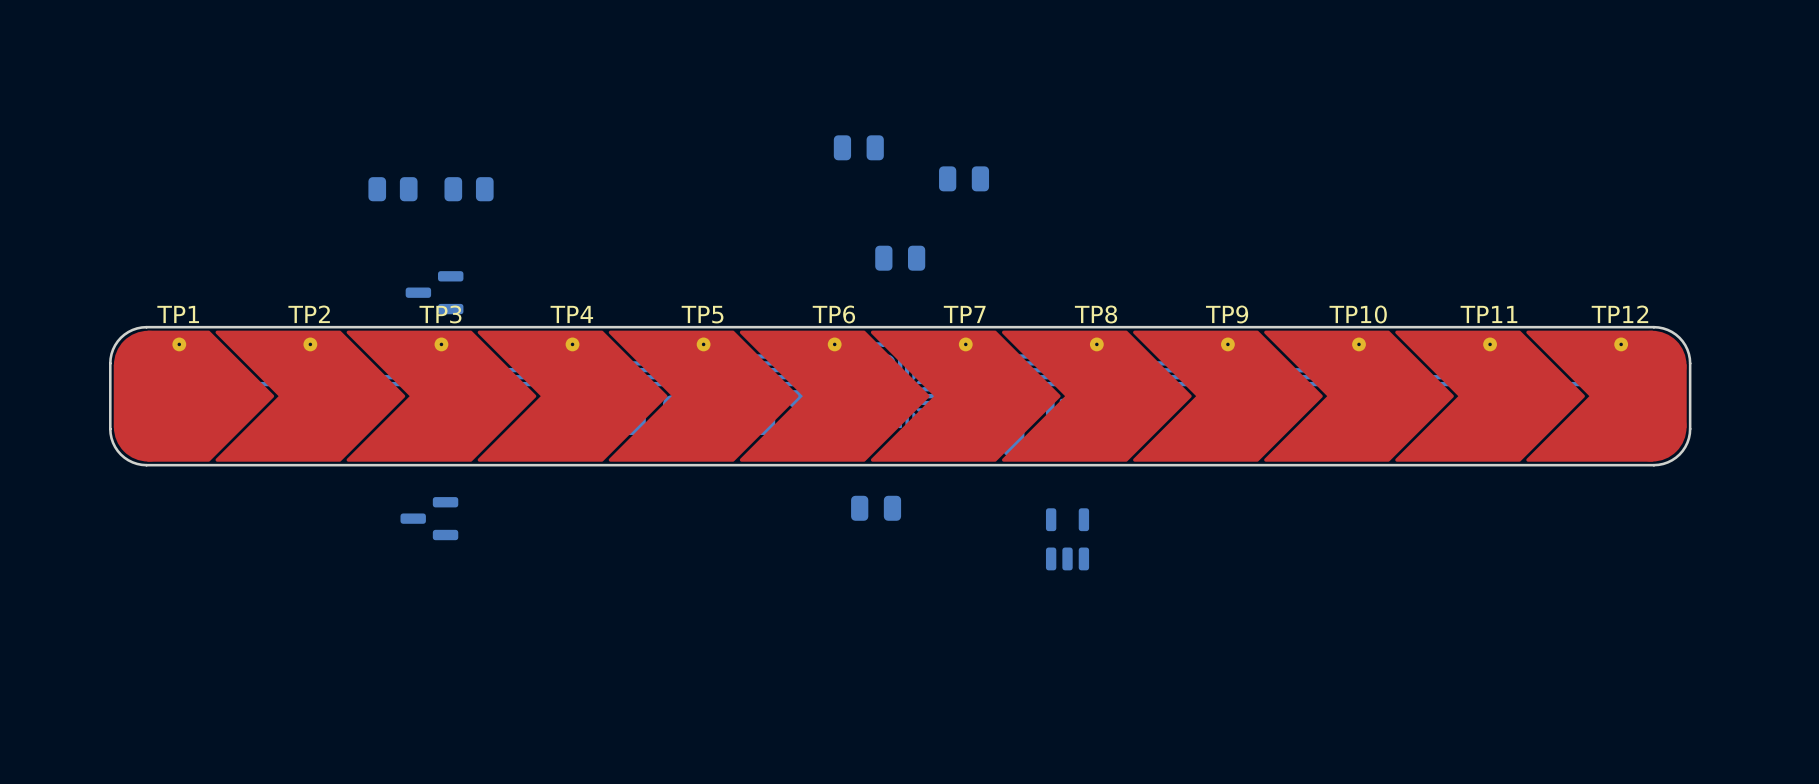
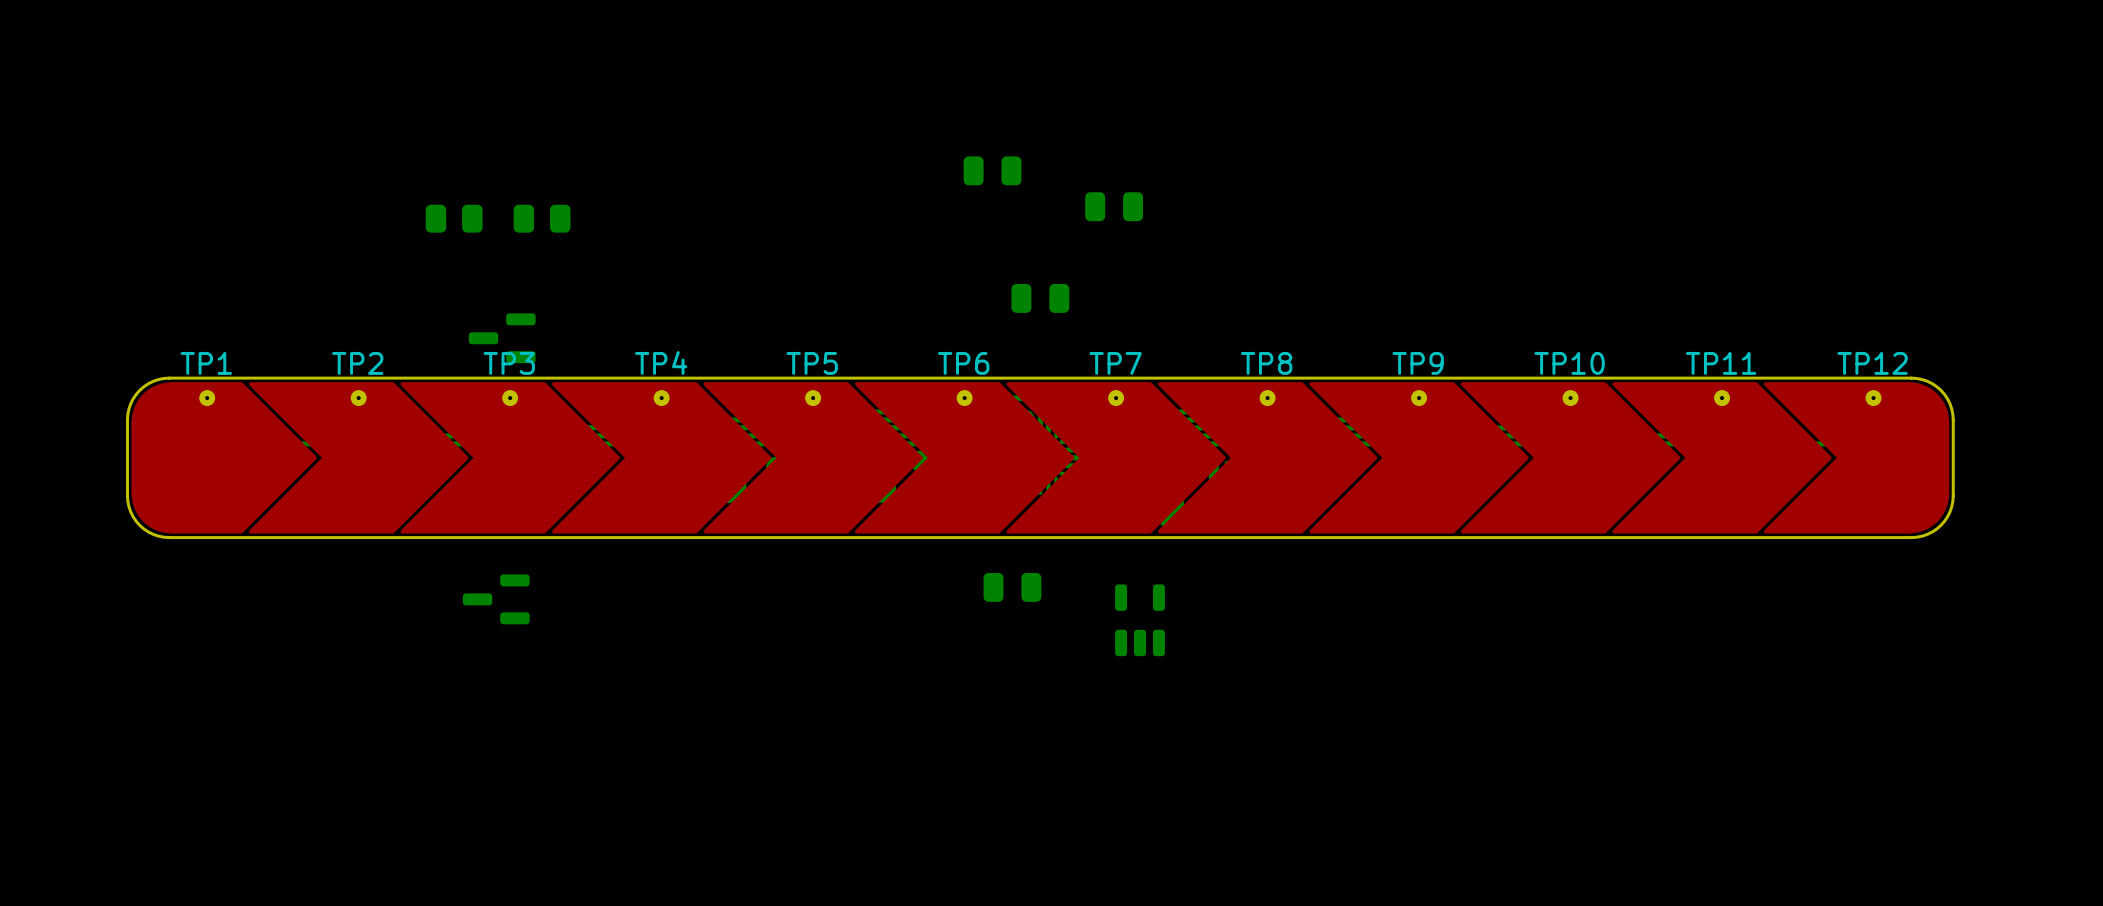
part position: (1067, 539) -> (1140, 620)

